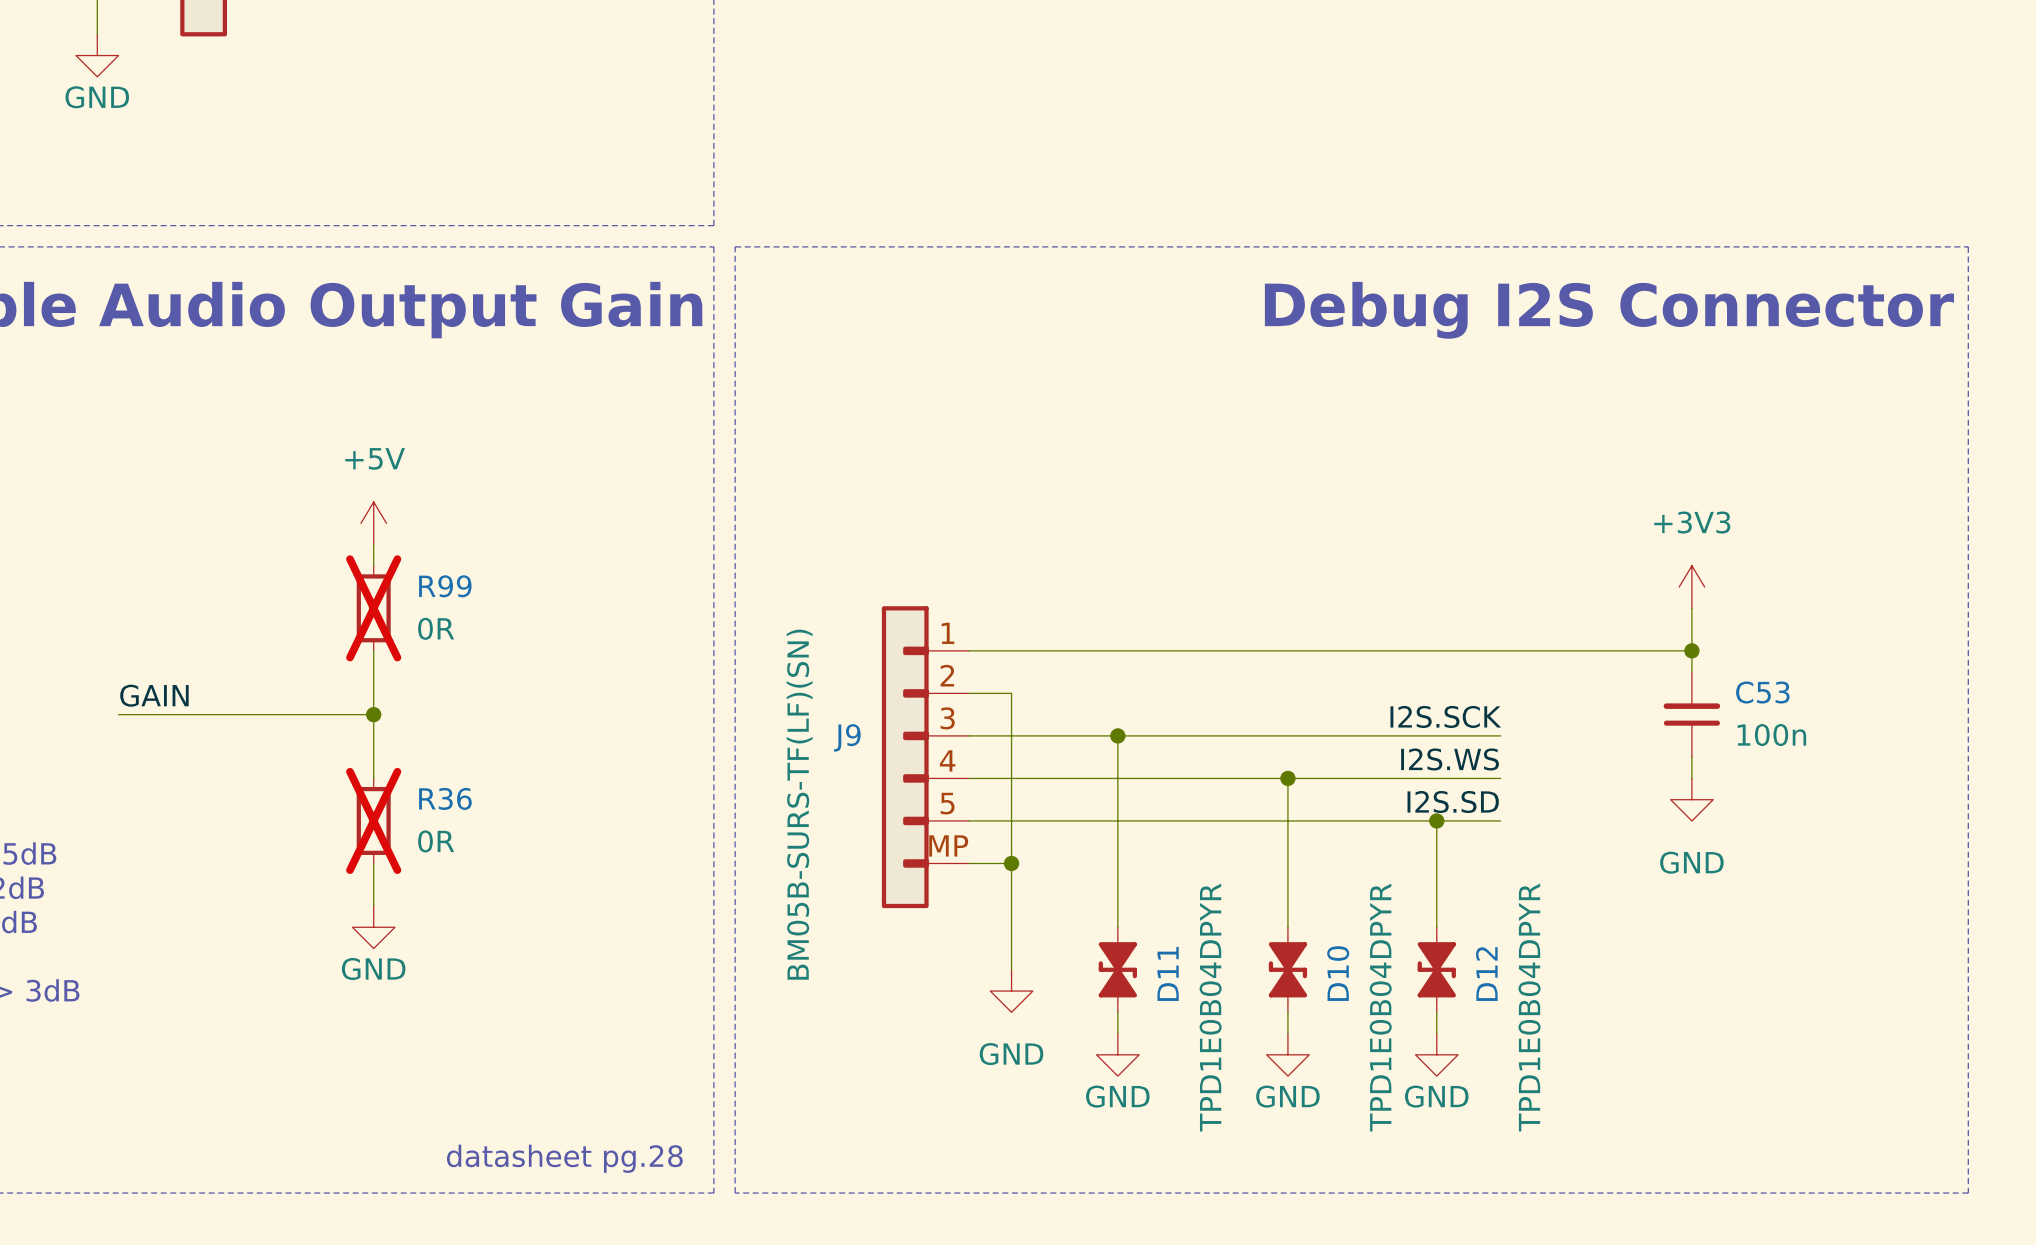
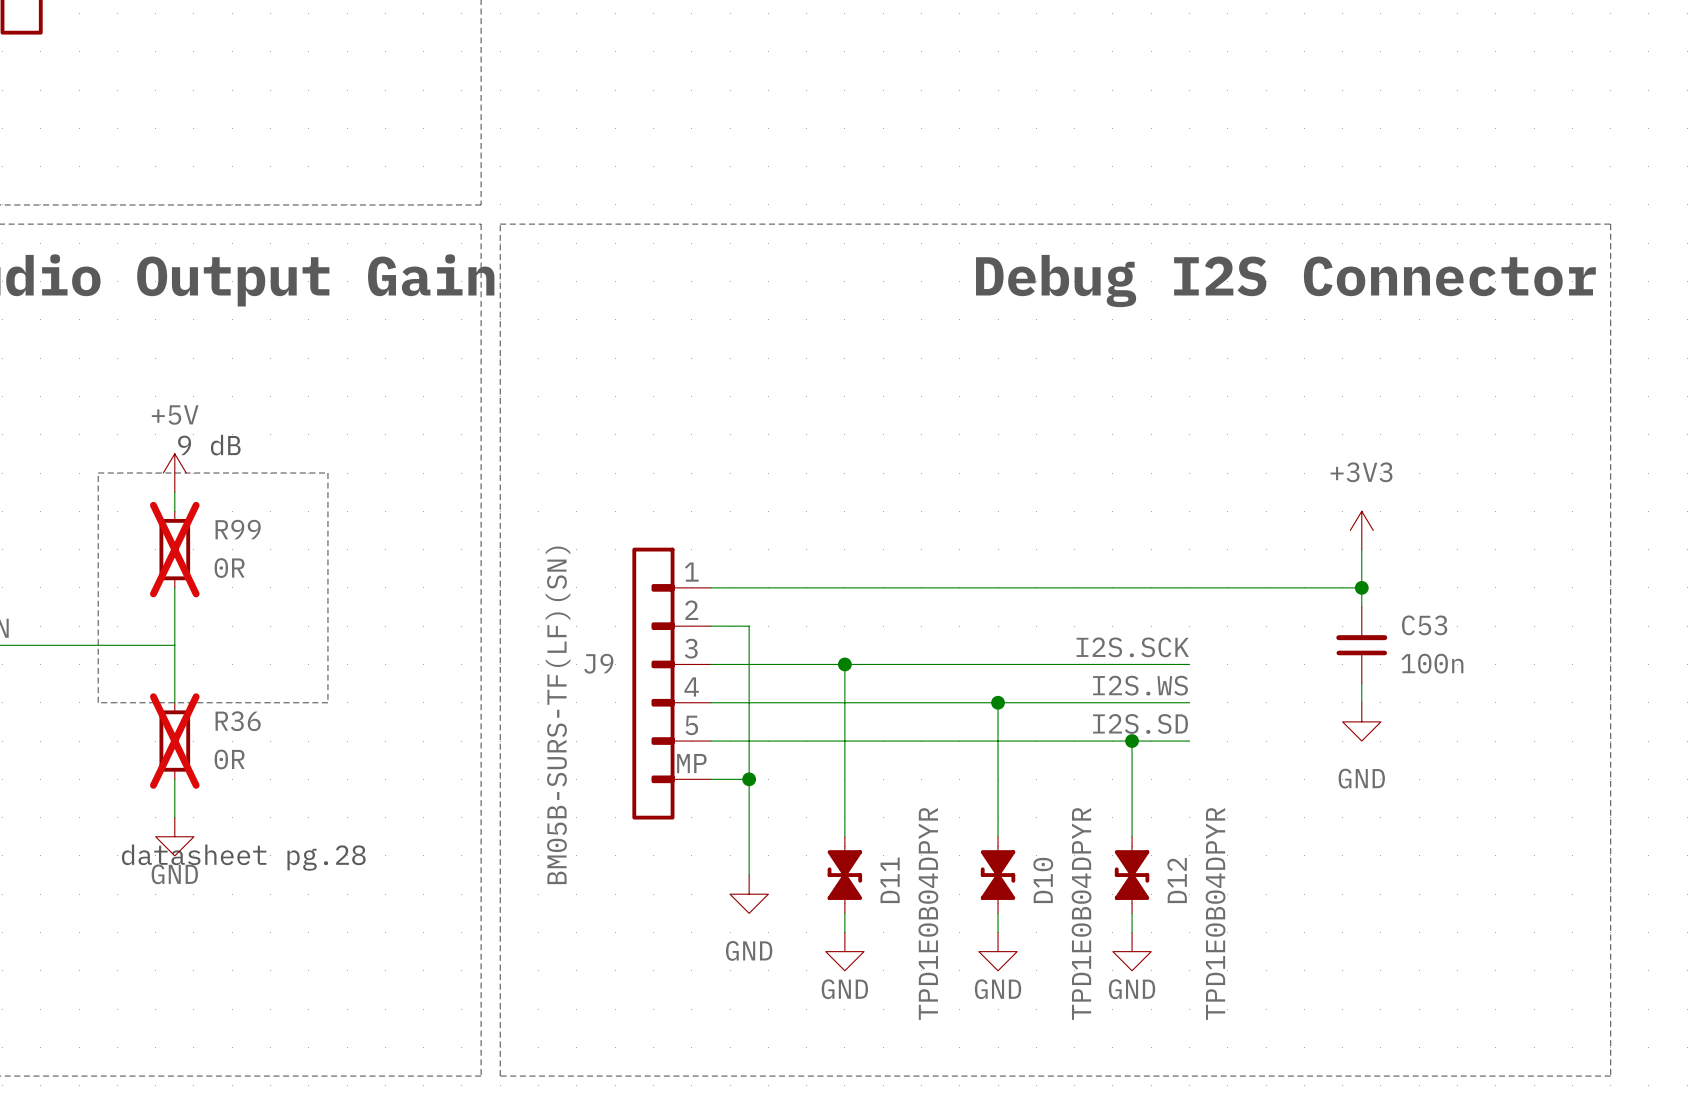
text: none -> 9 dB (209, 445)
line: none -> (98, 473) (327, 473) (327, 702) (98, 702) (98, 473)
junction: (373, 714) -> none
text position: datasheet pg.28 (564, 1158) -> datasheet pg.28 (243, 857)

